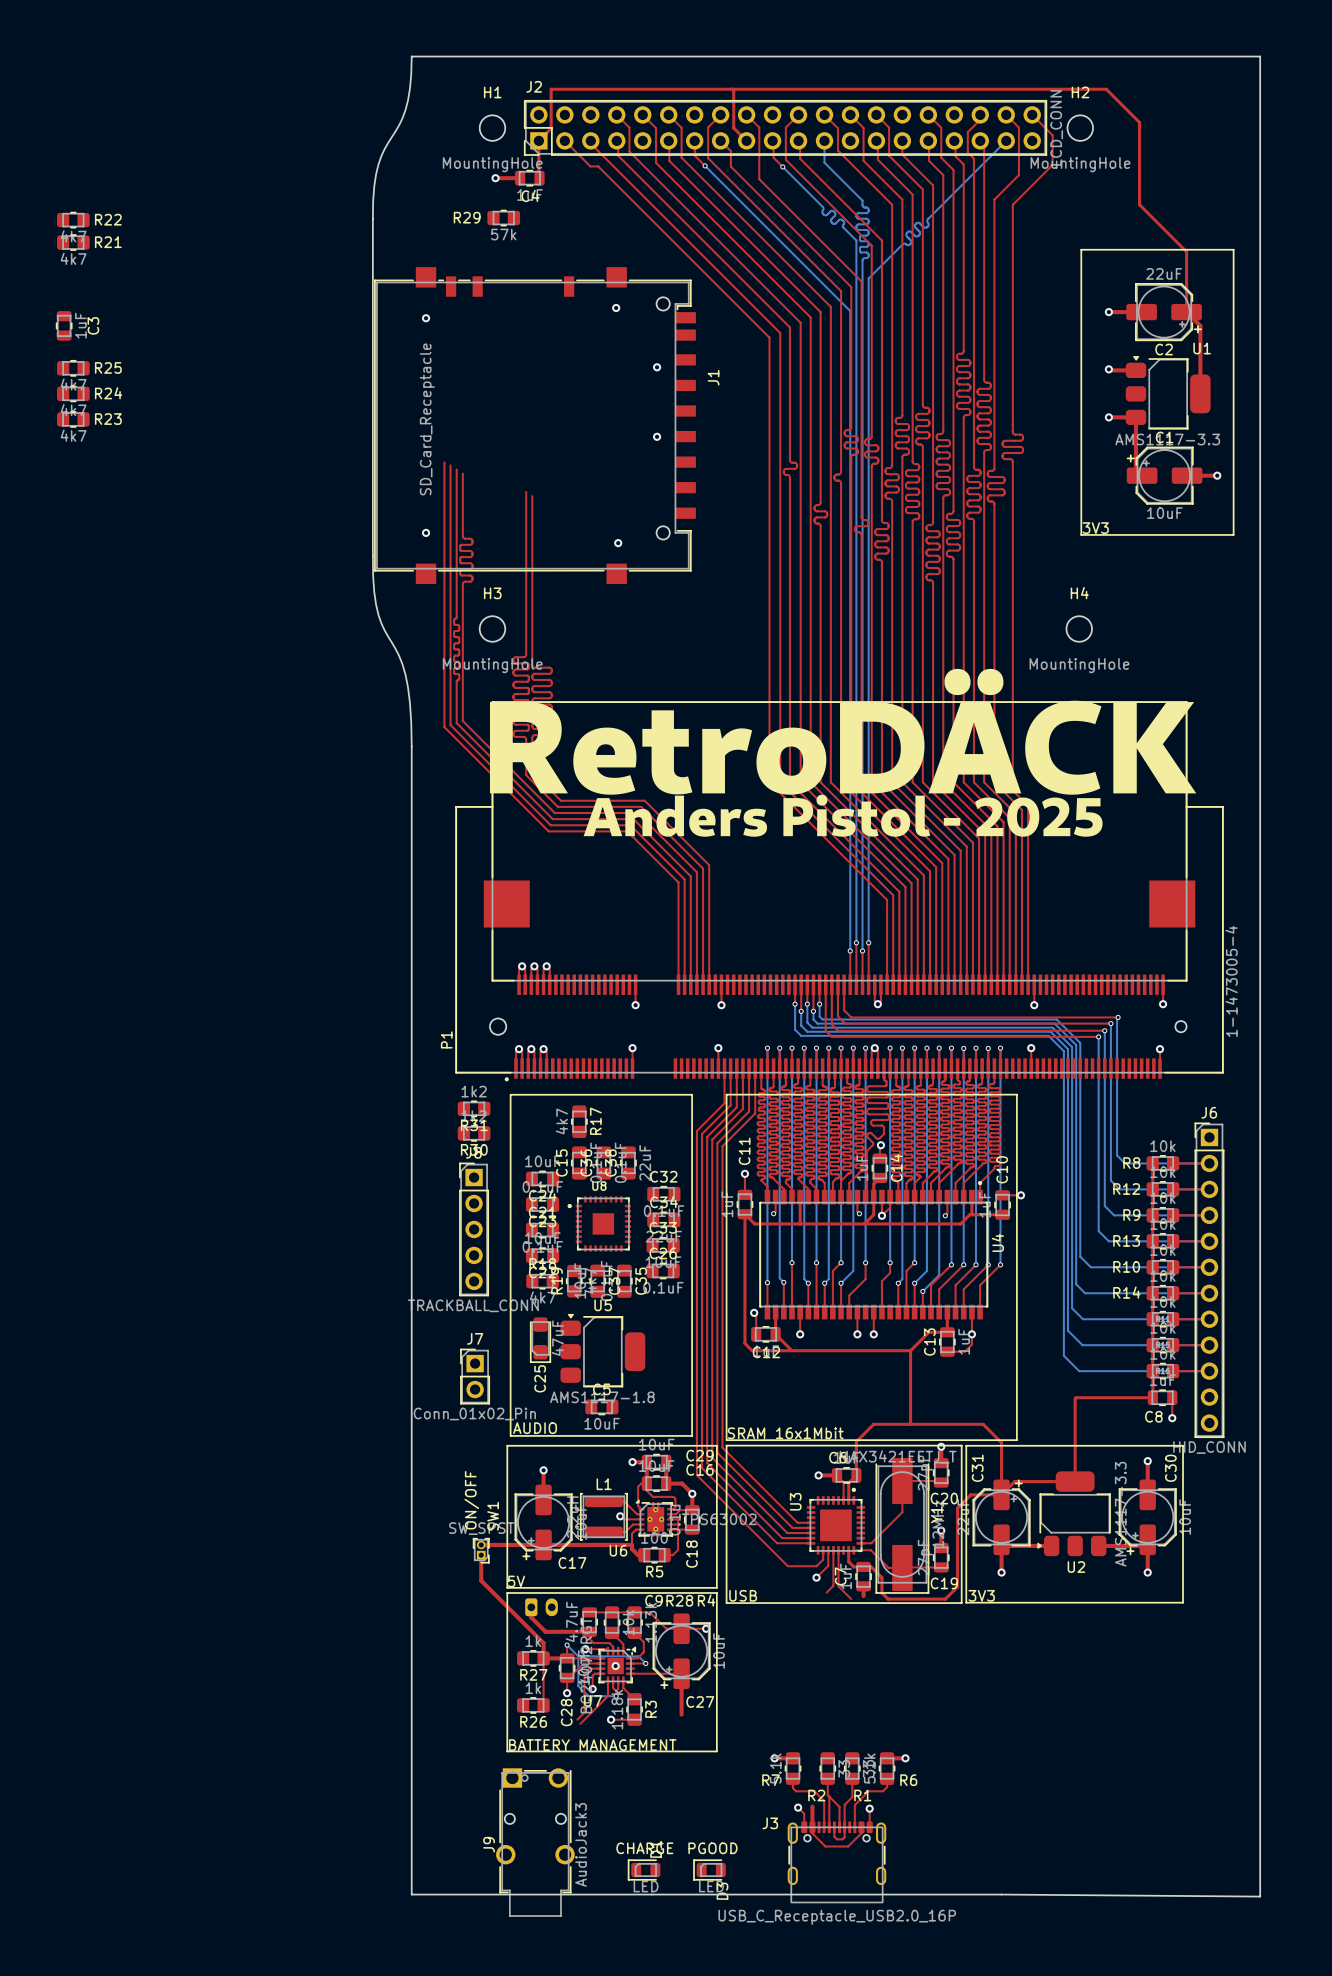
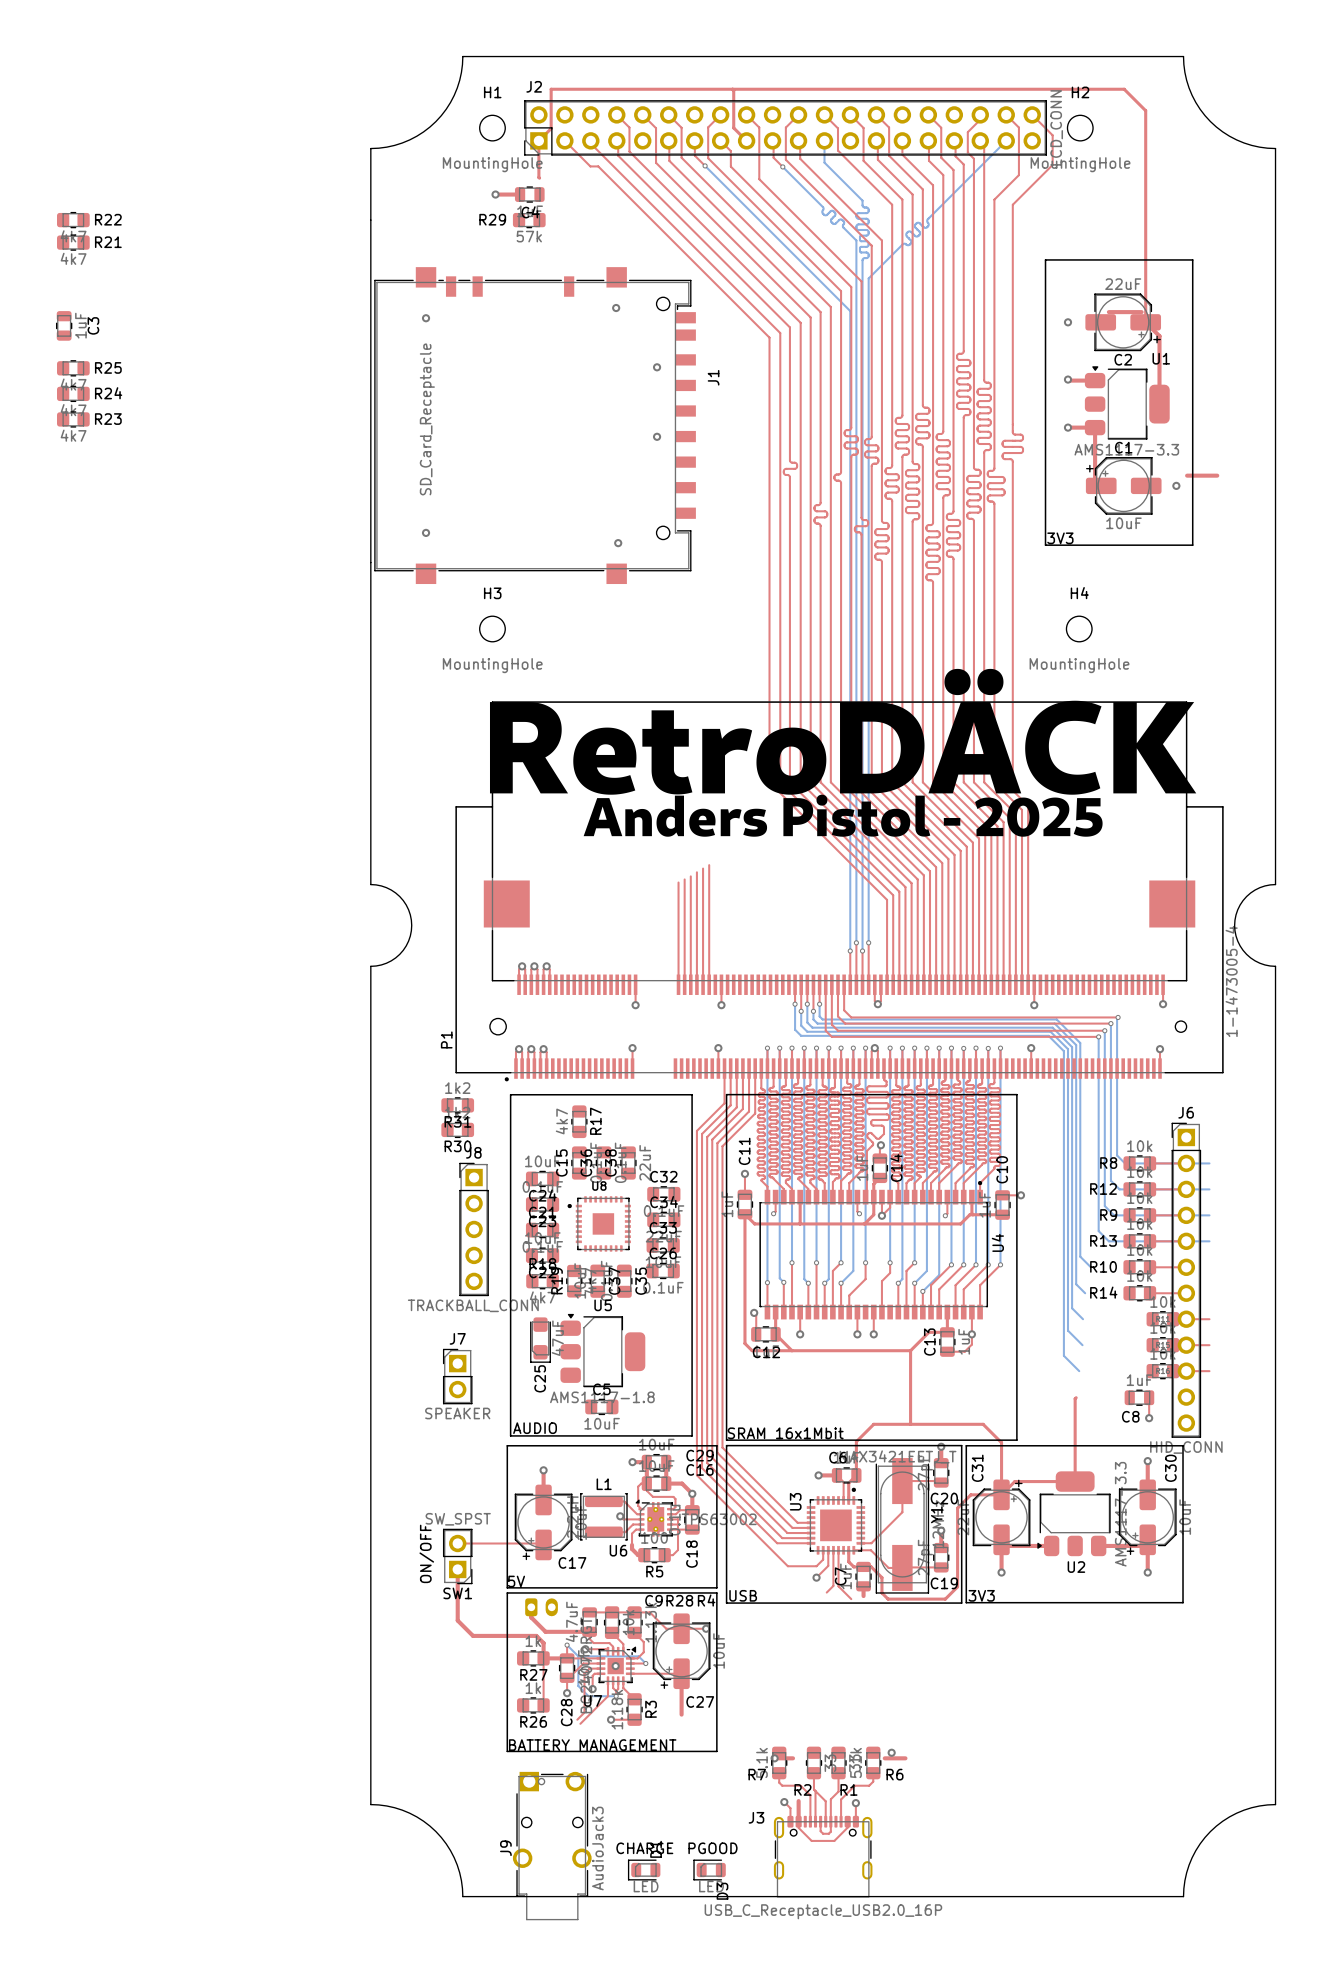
board edge: (462, 56) (411, 56) (410, 88) (405, 110) (381, 156) (376, 174) (373, 201) (374, 591) (381, 623) (399, 655) (405, 674) (411, 722) (411, 1894) (1260, 1896) (1260, 56) (1183, 56) -> (462, 56) (459, 80) (454, 95) (435, 121) (423, 131) (402, 142) (370, 148) (370, 884) (386, 887) (399, 896) (408, 909) (411, 925) (408, 941) (399, 954) (386, 963) (370, 966) (370, 1804) (402, 1810) (416, 1816) (435, 1831) (450, 1850) (457, 1865) (462, 1896) (1183, 1896) (1184, 1880) (1192, 1857) (1210, 1831) (1222, 1821) (1244, 1810) (1275, 1804) (1275, 966) (1259, 963) (1246, 954) (1237, 941) (1234, 925) (1237, 909) (1246, 896) (1259, 887) (1275, 884) (1275, 148) (1244, 142) (1229, 136) (1210, 121) (1200, 109) (1189, 88) (1183, 56)
top track: (1106, 89) (1139, 122) (1139, 204) (1186, 251) (1186, 312) (1200, 325) (1200, 393) -> (1106, 89) (1124, 89) (1145, 110) (1145, 322) (1159, 336) (1159, 404)
top track: (495, 178) (520, 178) -> (495, 194) (520, 194)
via position: (495, 178) -> (495, 194)
C4 position: (529, 178) -> (529, 194)
R29 position: (503, 218) -> (529, 220)
line: (1081, 249) (1233, 249) (1233, 534) (1081, 534) (1081, 249) -> (1045, 259) (1045, 545) (1192, 545) (1192, 259) (1045, 259)
via: (1108, 312) -> none
C2 position: (1164, 312) -> (1123, 322)
via: none -> (1068, 322)
top track: (1108, 369) (1135, 370) -> (1068, 379) (1095, 380)
via: (1108, 369) -> none
via: none -> (1068, 379)
U1 position: (1168, 392) -> (1127, 402)
top track: (1108, 417) (1135, 417) (1135, 469) (1142, 475) -> (1068, 427) (1095, 427) (1095, 479) (1101, 485)
via: (1108, 417) -> none
via: none -> (1068, 427)
top track: (444, 462) (444, 727) (548, 831) (627, 831) (678, 882) -> none
top track: (450, 465) (450, 725) (550, 825) (630, 825) (684, 879) -> none
top track: (456, 469) (456, 617) (454, 620) (454, 624) (459, 626) (458, 630) (454, 632) (454, 636) (459, 638) (458, 642) (454, 644) (454, 648) (459, 650) (458, 655) (454, 656) (454, 661) (459, 662) (458, 667) (454, 669) (454, 673) (459, 675) (456, 681) (456, 723) (552, 819) (633, 819) (690, 876) -> none
top track: (462, 473) (462, 536) (472, 541) (470, 544) (460, 546) (460, 550) (470, 551) (472, 553) (470, 556) (460, 558) (460, 563) (470, 563) (472, 565) (470, 569) (460, 570) (460, 575) (470, 575) (472, 577) (471, 581) (462, 583) (462, 721) (554, 813) (637, 813) (696, 872) -> none
C1 position: (1164, 475) -> (1123, 485)
via position: (1217, 475) -> (1176, 485)
top track: (526, 492) (526, 655) (524, 657) (515, 657) (513, 659) (515, 663) (528, 664) (527, 669) (515, 669) (513, 671) (515, 675) (528, 676) (527, 681) (515, 681) (513, 684) (515, 687) (528, 688) (527, 693) (515, 694) (513, 696) (515, 700) (528, 701) (527, 706) (515, 706) (513, 708) (515, 712) (528, 713) (527, 718) (515, 718) (513, 720) (515, 724) (528, 725) (528, 730) (515, 730) (513, 733) (514, 736) (526, 738) (526, 775) (557, 806) (641, 806) (703, 868) -> none
top track: (532, 496) (532, 665) (534, 667) (549, 667) (551, 670) (550, 673) (534, 673) (532, 675) (533, 679) (549, 679) (551, 682) (549, 686) (532, 687) (533, 692) (549, 692) (551, 694) (549, 698) (533, 699) (533, 704) (549, 704) (551, 708) (549, 710) (533, 710) (532, 715) (549, 716) (551, 720) (549, 722) (533, 723) (532, 727) (549, 729) (551, 732) (549, 735) (532, 736) (532, 772) (560, 800) (644, 800) (709, 865) -> none
text position: 3V3 (1095, 528) -> 3V3 (1060, 538)
R31 position: (474, 1108) -> (457, 1105)
R30 position: (474, 1133) -> (457, 1129)
top track: (1152, 1163) (1152, 1397) (1076, 1397) -> none
R8 position: (1162, 1163) -> (1139, 1163)
top track: (1186, 1163) (1209, 1163) -> (1150, 1163) (1173, 1163)
R12 position: (1162, 1189) -> (1139, 1189)
top track: (1186, 1189) (1209, 1189) -> (1150, 1189) (1173, 1189)
R9 position: (1162, 1215) -> (1139, 1215)
top track: (1186, 1215) (1209, 1215) -> (1150, 1215) (1173, 1215)
R13 position: (1162, 1241) -> (1139, 1241)
top track: (1186, 1241) (1209, 1241) -> (1150, 1241) (1173, 1241)
bottom track: (1090, 1267) (1209, 1267) -> none
R10 position: (1162, 1267) -> (1139, 1267)
top track: (1186, 1267) (1209, 1267) -> (1150, 1267) (1173, 1267)
J6 position: (1209, 1280) -> (1186, 1280)
bottom track: (1085, 1293) (1209, 1293) -> none
R14 position: (1162, 1293) -> (1139, 1293)
top track: (1186, 1293) (1209, 1293) -> (1150, 1293) (1173, 1293)
bottom track: (1083, 1319) (1209, 1319) -> none
bottom track: (1082, 1345) (1209, 1345) -> none
bottom track: (1079, 1371) (1209, 1371) -> none
J7 position: (475, 1376) -> (457, 1376)
C8 position: (1162, 1397) -> (1139, 1397)
top track: (1172, 1397) (1172, 1418) -> (1149, 1397) (1149, 1418)
J7 value: Conn_01x02_Pin (474, 1413) -> SPEAKER (457, 1413)
via position: (1172, 1418) -> (1149, 1418)
text position: ON/OFF (471, 1500) -> ON/OFF (426, 1553)
SW1 name position: SW1 (493, 1516) -> SW1 (457, 1593)
SW1 footprint: [473, 1538, 490, 1564] -> [443, 1528, 473, 1585]
top track: none -> (457, 1543) (543, 1544)
top track: (481, 1544) (632, 1544) -> none
top track: (481, 1555) (481, 1580) (536, 1635) -> (457, 1569) (457, 1620) (473, 1635) (536, 1635)
via position: (905, 1758) -> (891, 1752)
R7 position: (793, 1768) -> (779, 1762)
R2 position: (827, 1768) -> (813, 1762)
R1 position: (852, 1768) -> (838, 1762)
R6 position: (887, 1768) -> (873, 1762)
top track: (793, 1778) (793, 1788) (796, 1791) (814, 1791) (824, 1801) (824, 1824) -> (779, 1773) (779, 1782) (782, 1785) (800, 1785) (810, 1795) (810, 1819)
top track: (827, 1778) (827, 1795) (839, 1806) (839, 1824) -> (813, 1773) (813, 1789) (825, 1801) (825, 1819)
top track: (852, 1778) (852, 1797) (844, 1804) (844, 1824) -> (838, 1773) (838, 1791) (830, 1799) (830, 1819)
top track: (887, 1778) (887, 1787) (882, 1791) (868, 1791) (854, 1805) (854, 1824) -> (873, 1773) (873, 1781) (869, 1785) (854, 1785) (841, 1799) (841, 1819)
top track: (829, 1796) (829, 1827) -> (815, 1791) (815, 1821)
top track: (812, 1806) (812, 1833) (825, 1846) (848, 1846) (861, 1833) (861, 1827) -> (798, 1801) (798, 1827) (811, 1840) (834, 1840) (847, 1827) (847, 1821)
top track: (798, 1807) (804, 1813) (804, 1827) -> (784, 1802) (790, 1808) (790, 1821)
via position: (798, 1807) -> (784, 1802)
top track: (869, 1808) (869, 1827) -> (855, 1803) (855, 1821)
via position: (869, 1808) -> (855, 1803)
top track: (834, 1827) (834, 1836) (836, 1839) (844, 1837) (844, 1827) -> (820, 1821) (820, 1831) (823, 1833) (830, 1831) (830, 1821)
J9 position: (535, 1842) -> (552, 1845)
J3 position: (836, 1862) -> (823, 1856)

